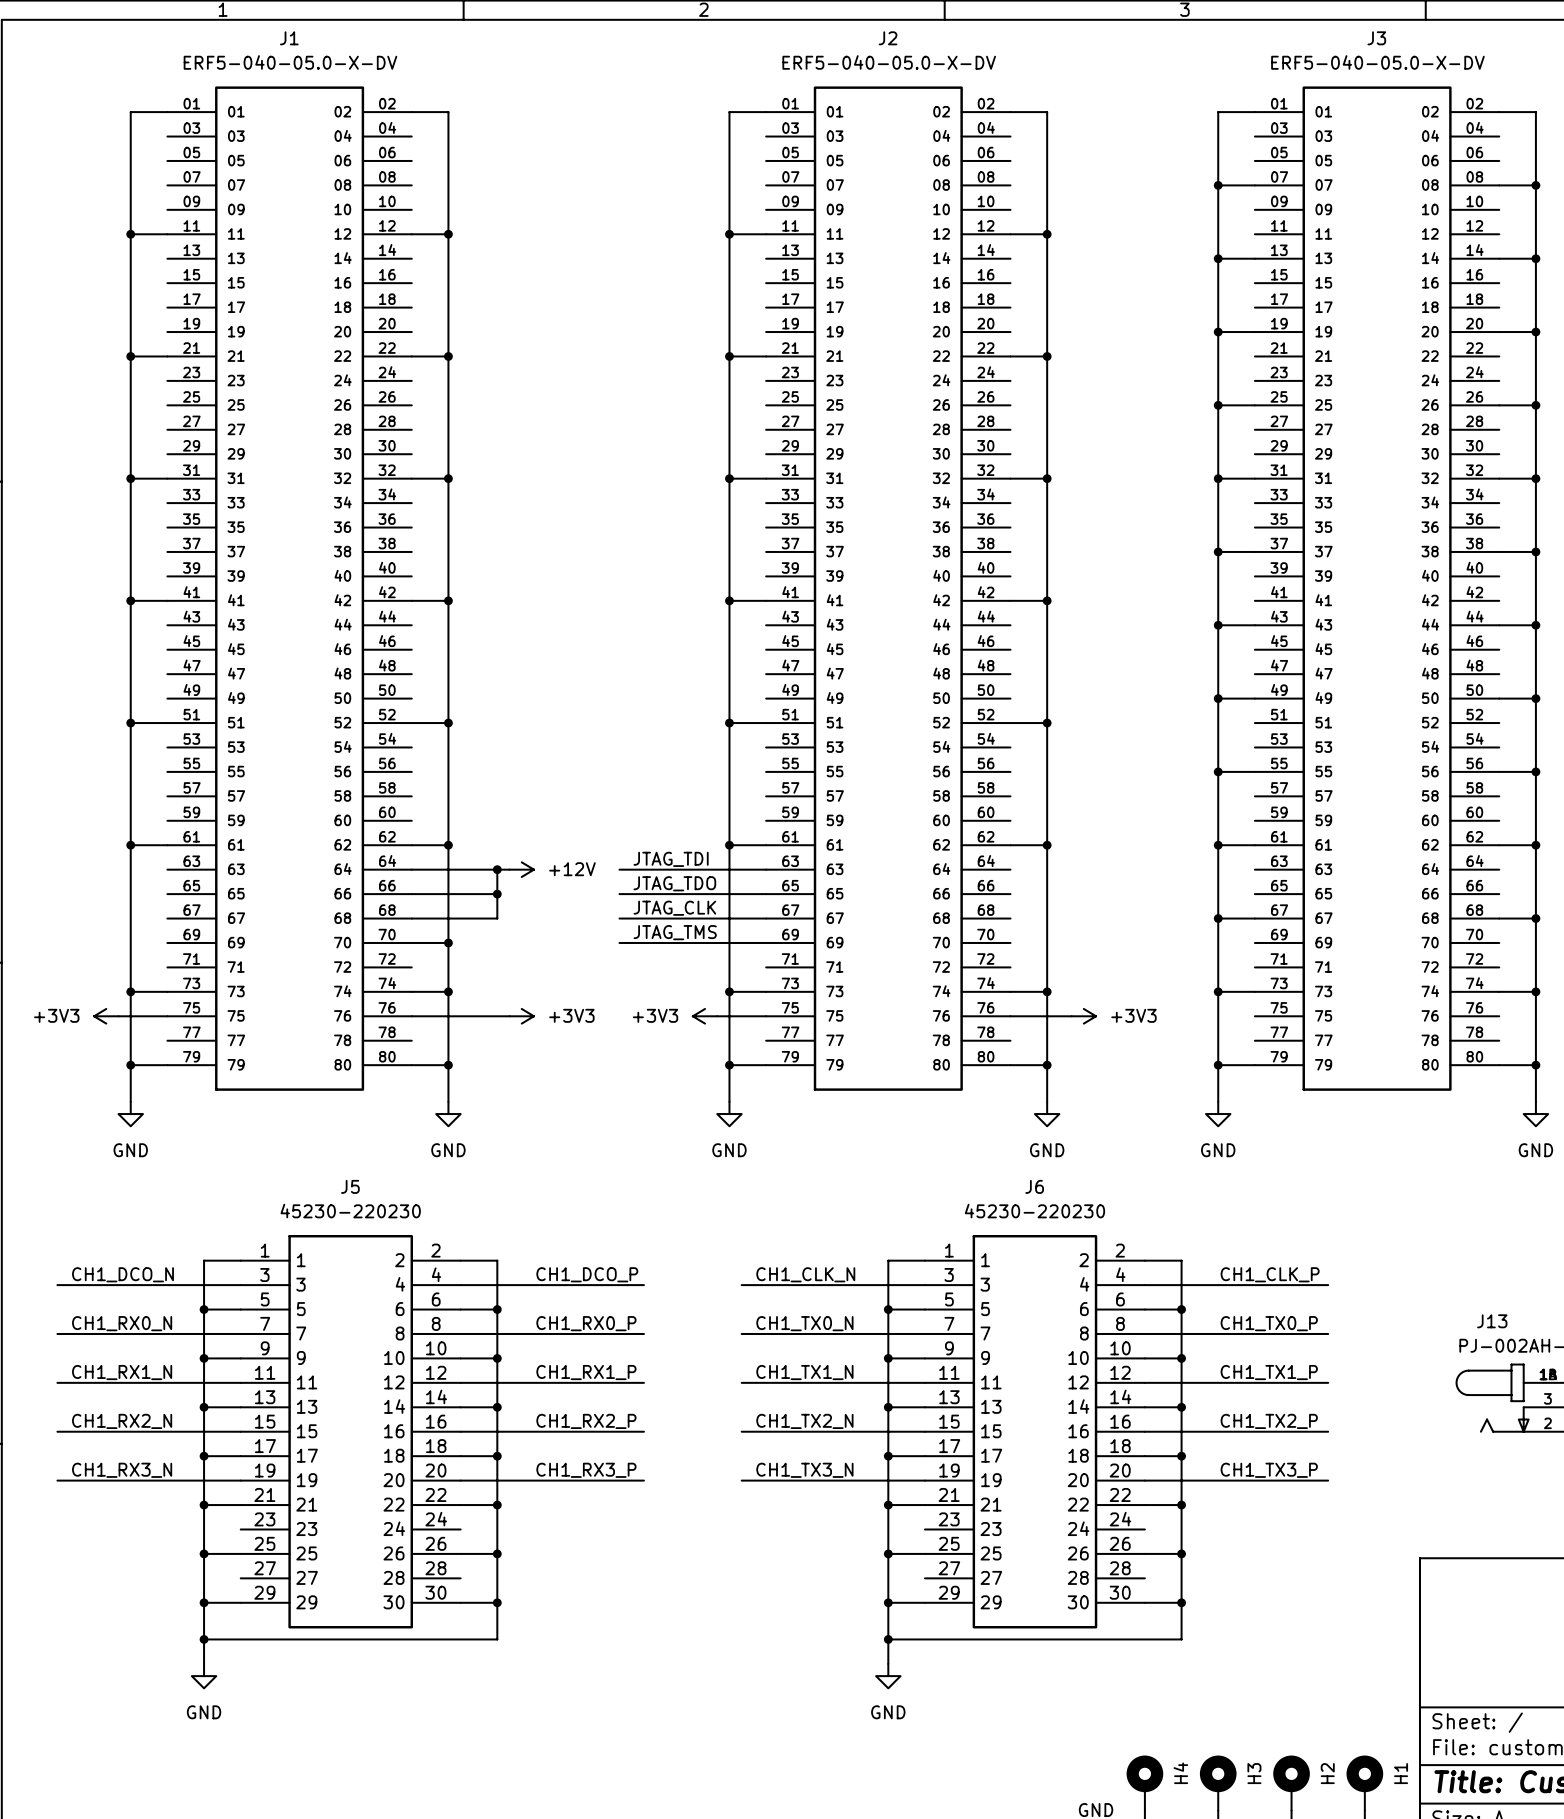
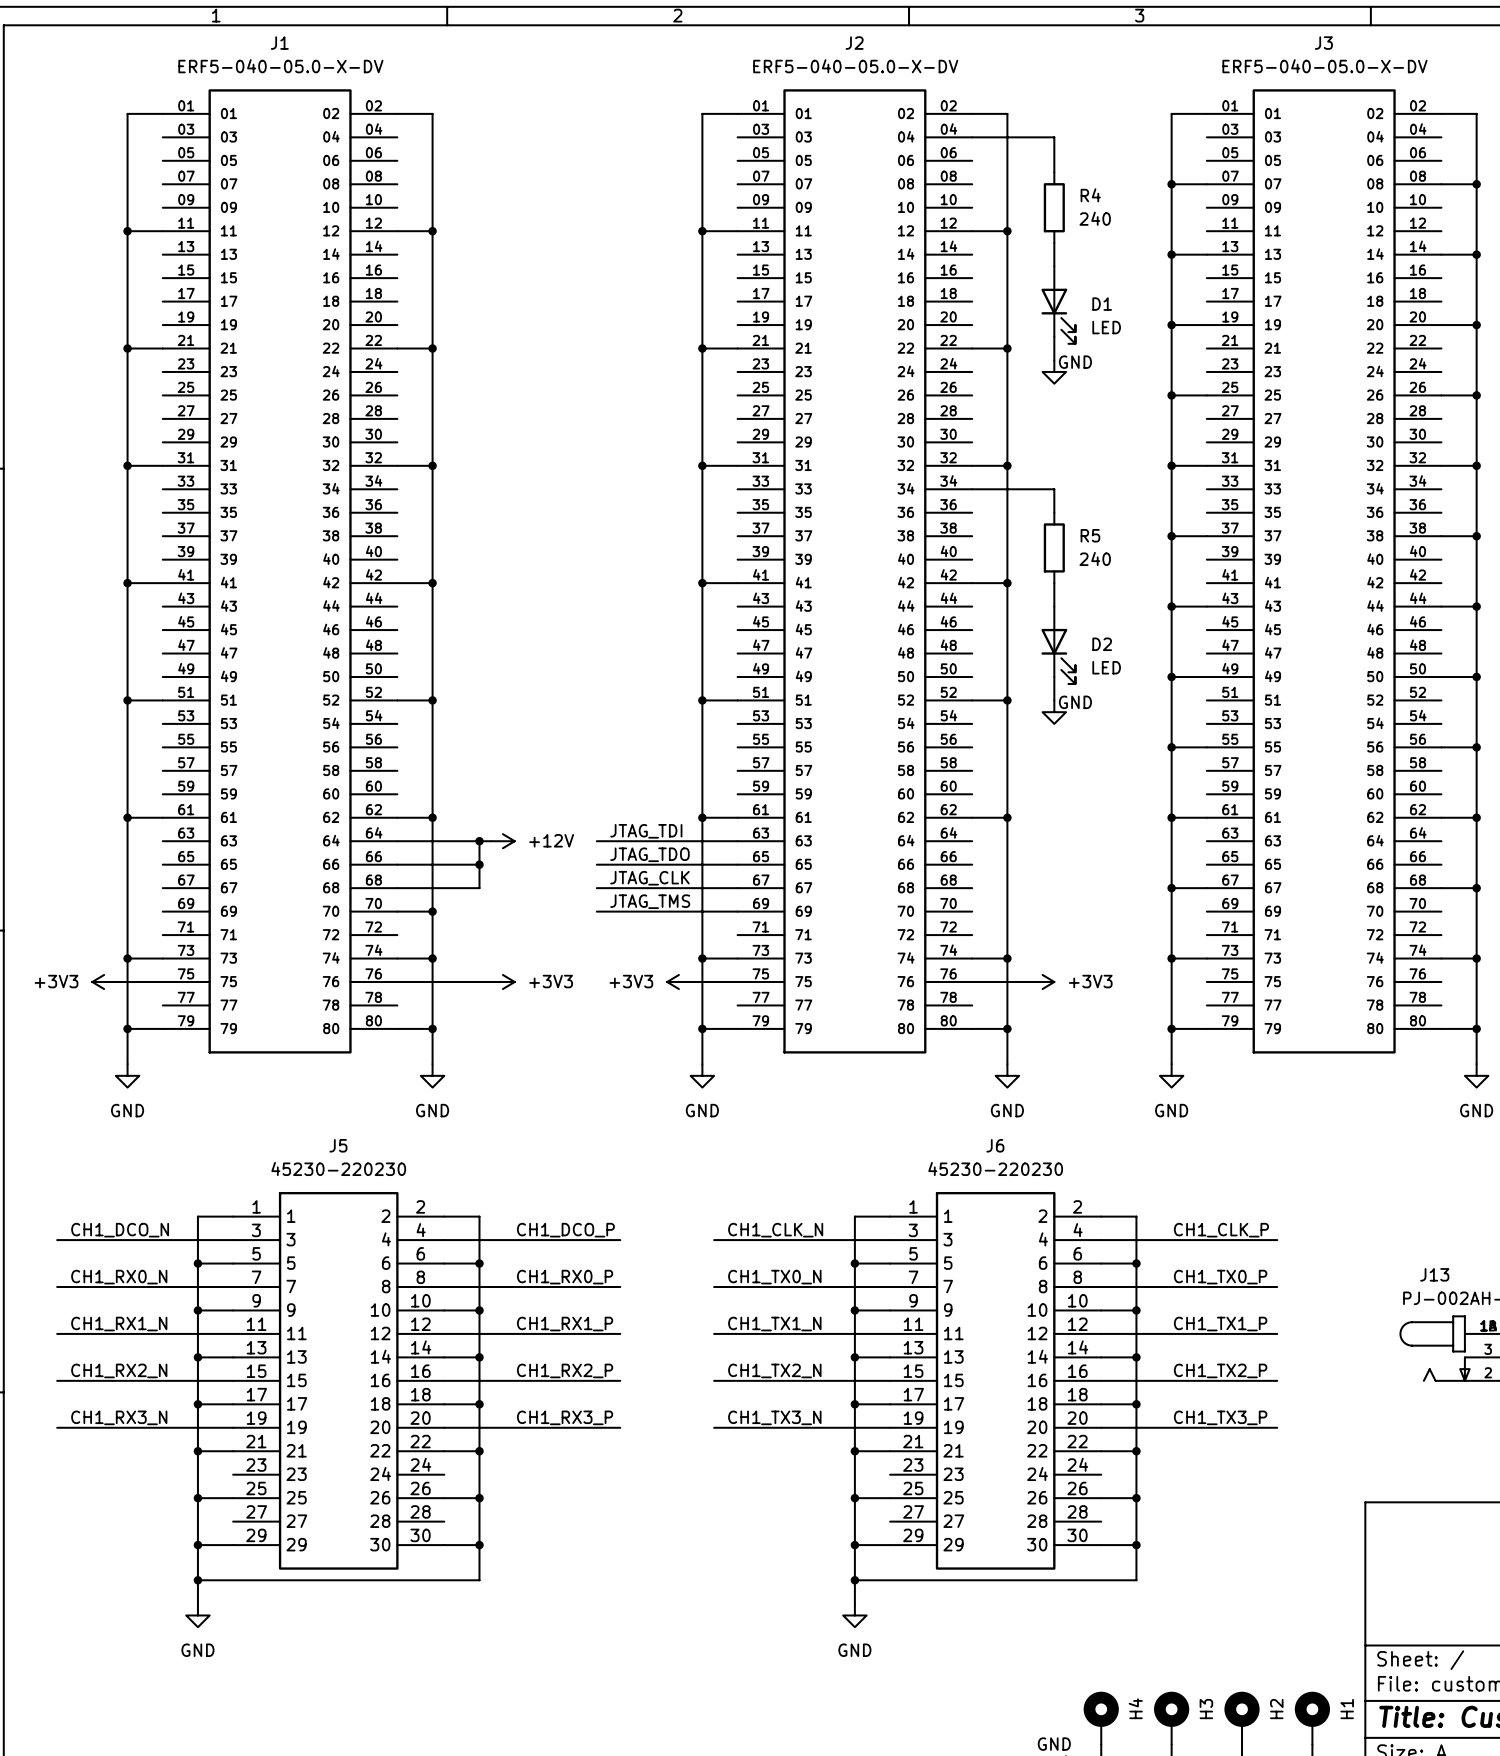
wire: none -> (972, 137) (1054, 137) (1054, 172)
R4: none -> 240 (1054, 207)
wire: none -> (1054, 242) (1054, 266)
D1: none -> LED (1058, 305)
wire: none -> (1054, 336) (1054, 360)
power symbol: none -> GND (1054, 371)
wire: none -> (972, 489) (1054, 489) (1054, 512)
R5: none -> 240 (1054, 547)
wire: none -> (1054, 583) (1054, 606)
D2: none -> LED (1058, 645)
wire: none -> (1054, 676) (1054, 700)
power symbol: none -> GND (1054, 712)

